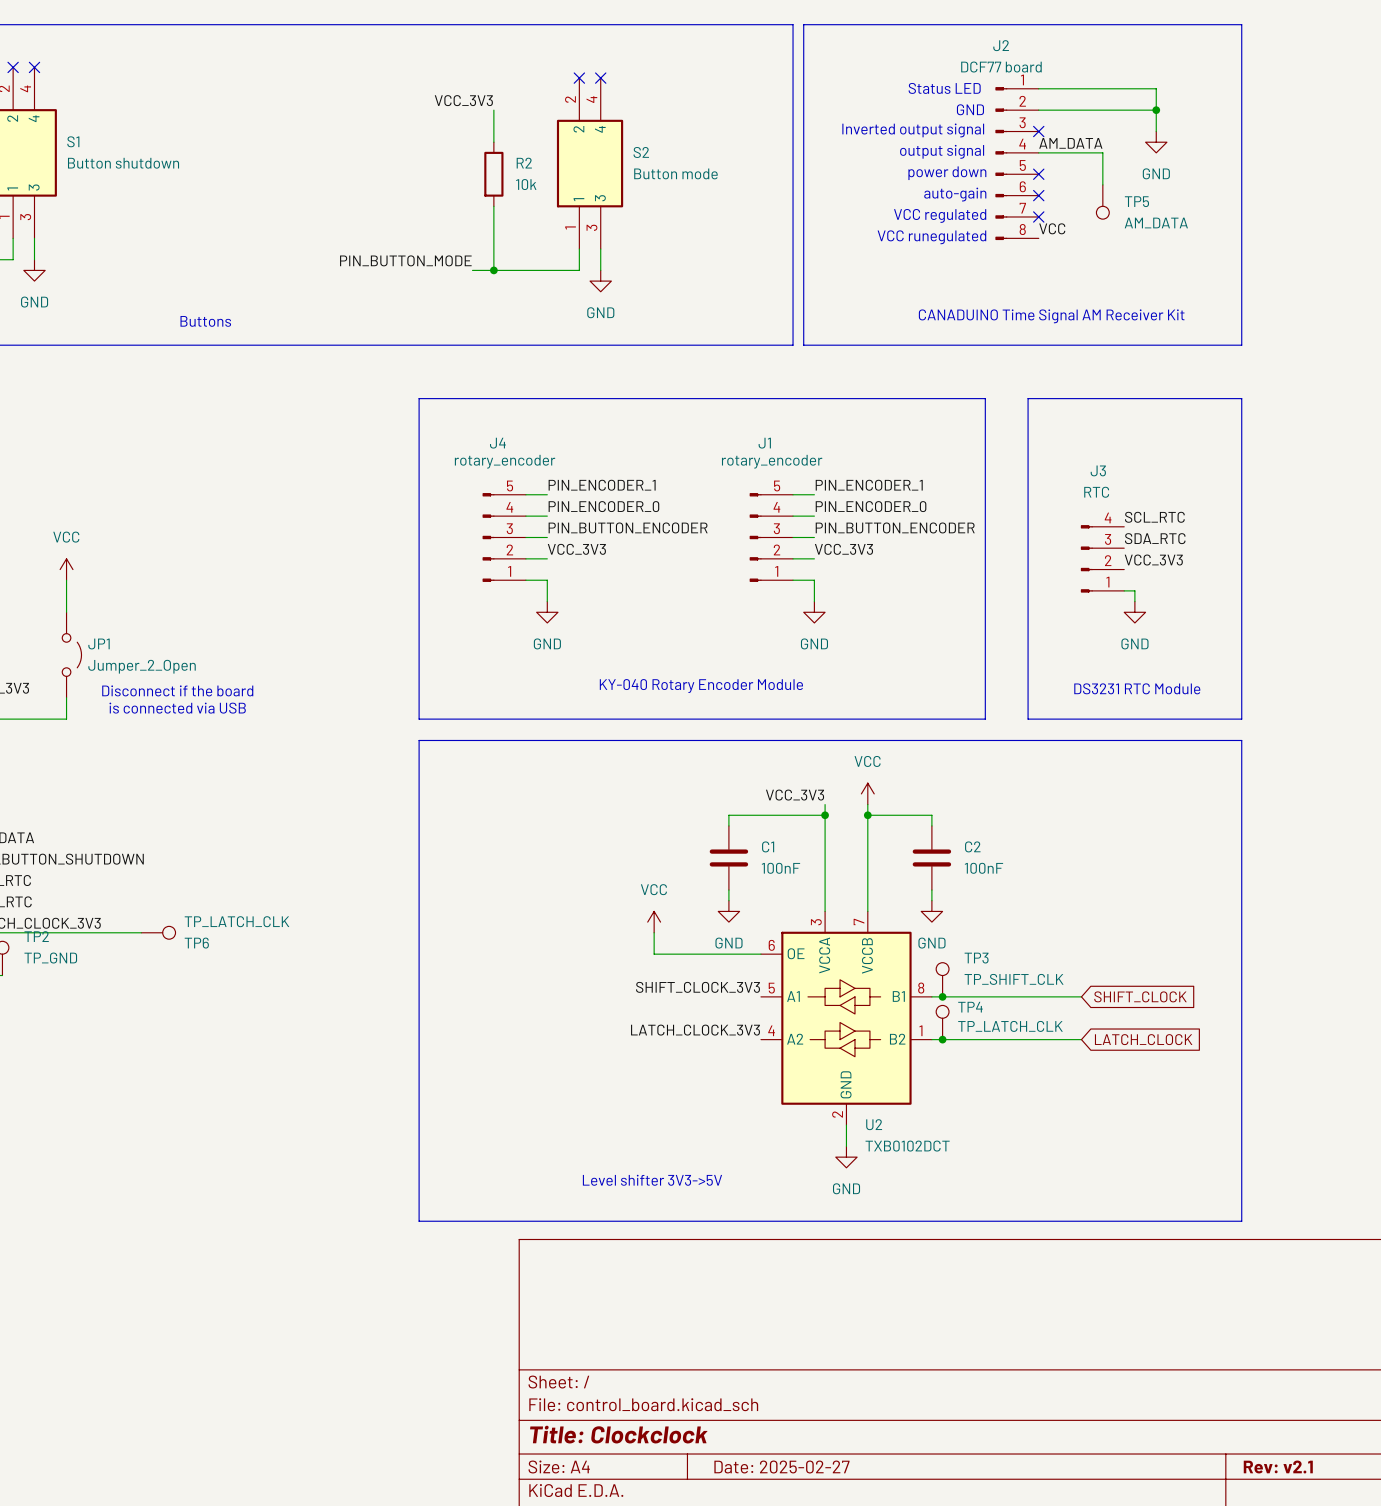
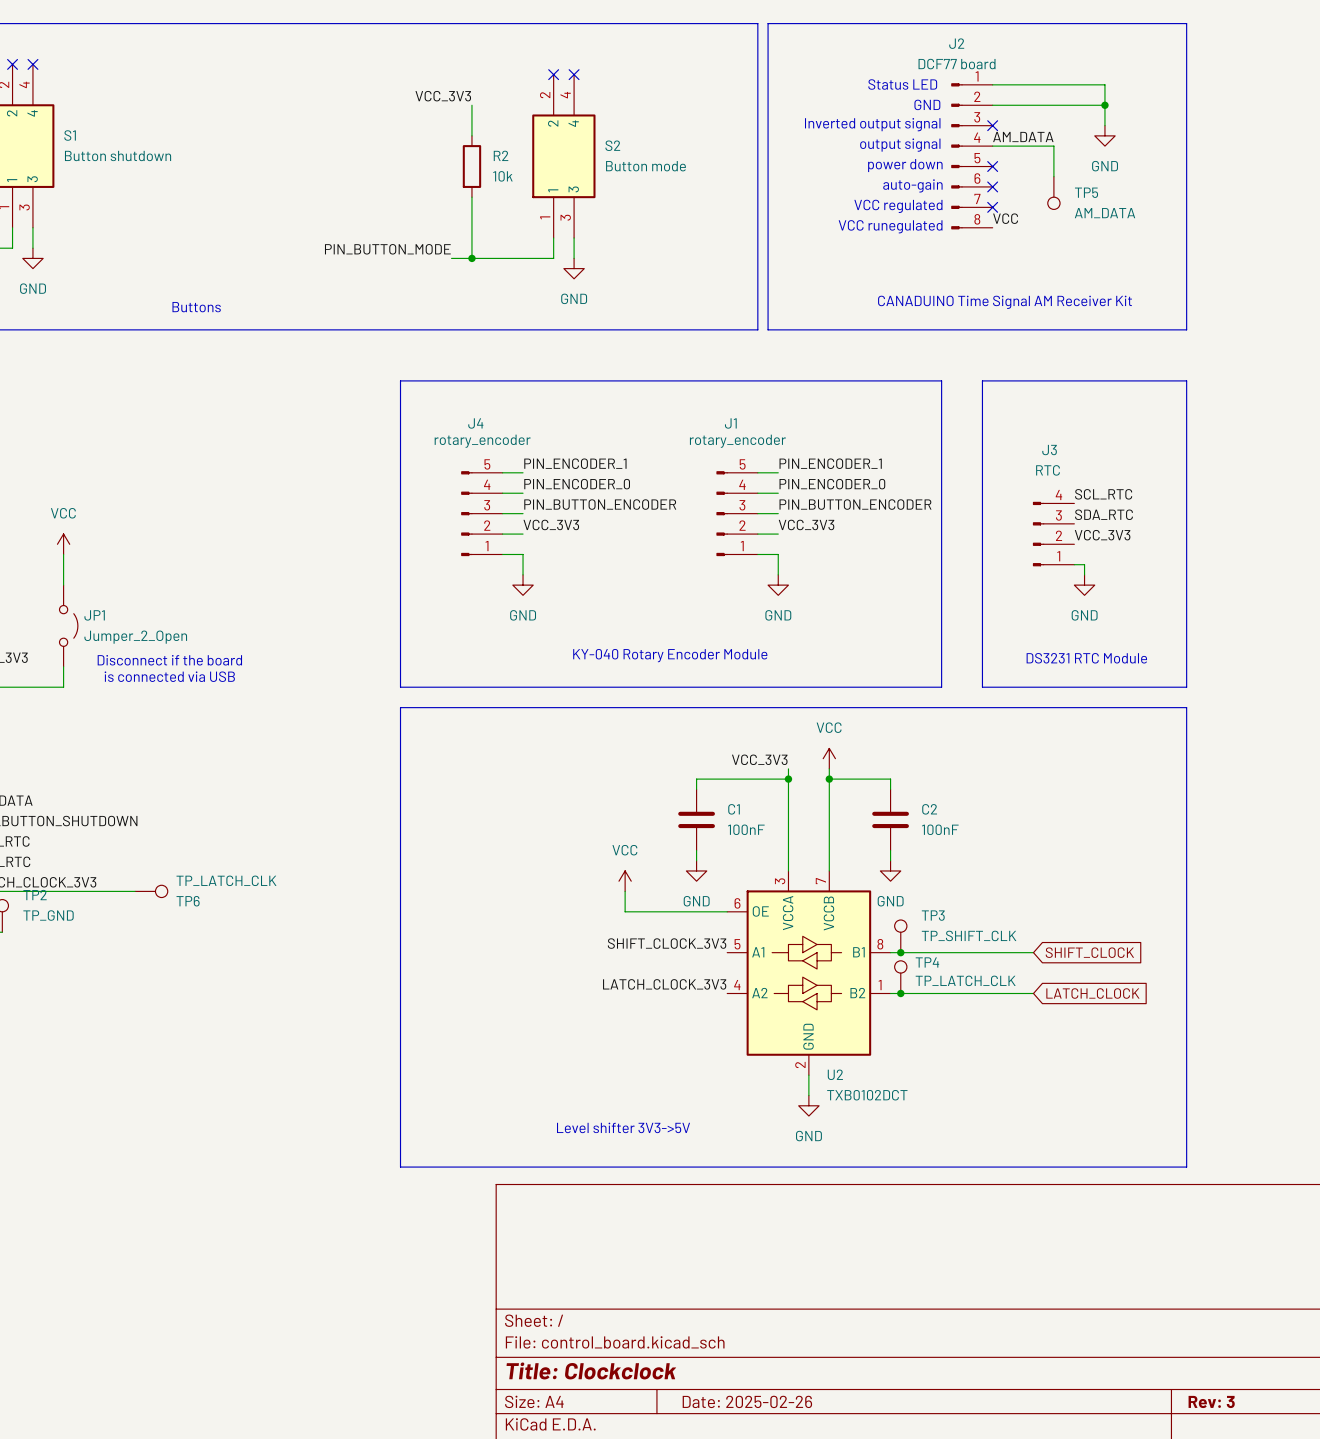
title block: Rev: v2.1 (1278, 1466) -> Rev: 3 (1211, 1401)
title block: Date: 2025-02-27 (781, 1467) -> Date: 2025-02-26 (747, 1401)

